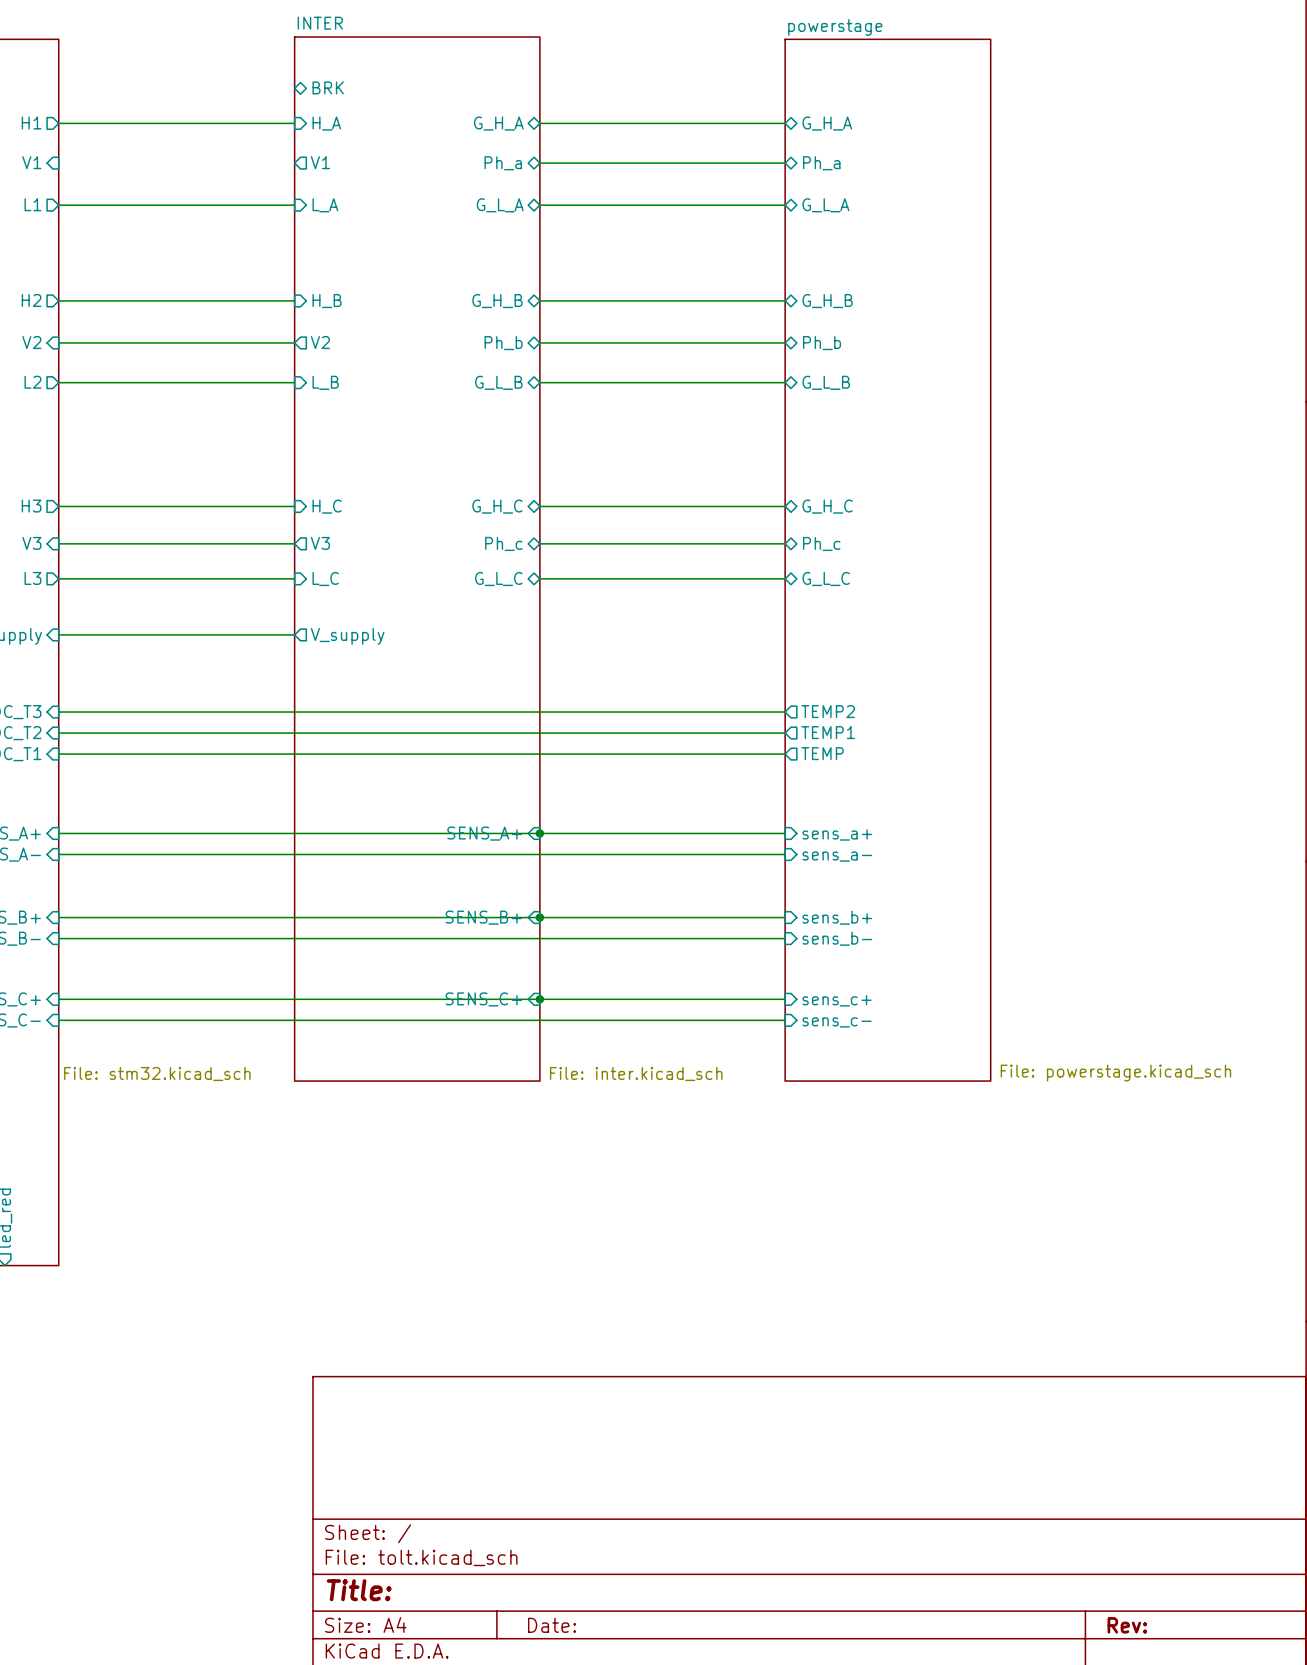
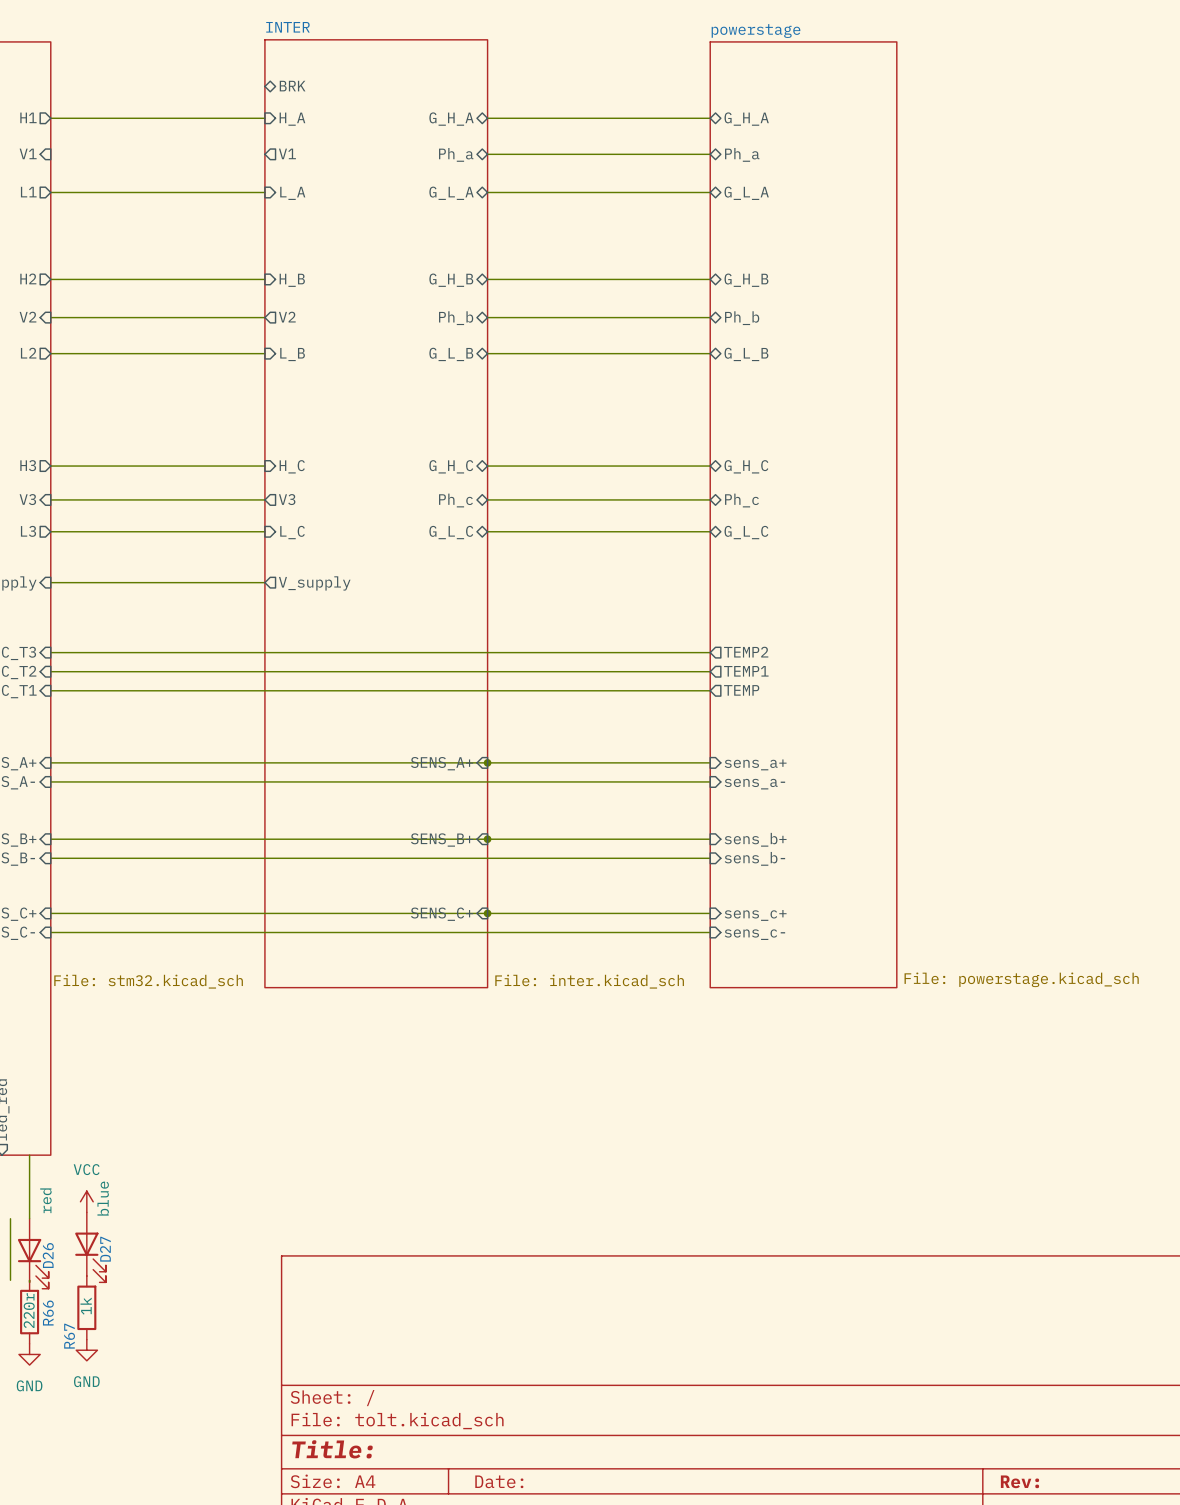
wire: none -> (29, 1155) (29, 1218)
power symbol: none -> VCC (86, 1201)
wire: none -> (10, 1218) (10, 1280)
D27: none -> blue (90, 1247)
D26: none -> red (33, 1253)
wire: none -> (29, 1280) (29, 1282)
R67: none -> 1k (86, 1307)
R66: none -> 220r (29, 1312)
power symbol: none -> GND (86, 1350)
power symbol: none -> GND (29, 1354)

